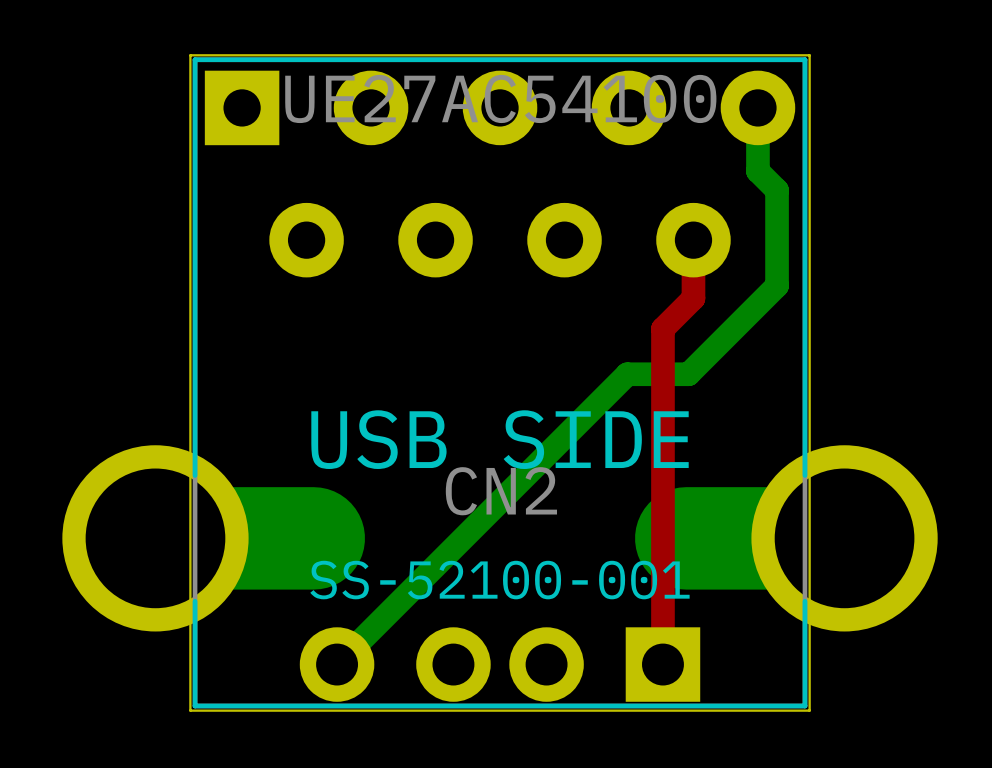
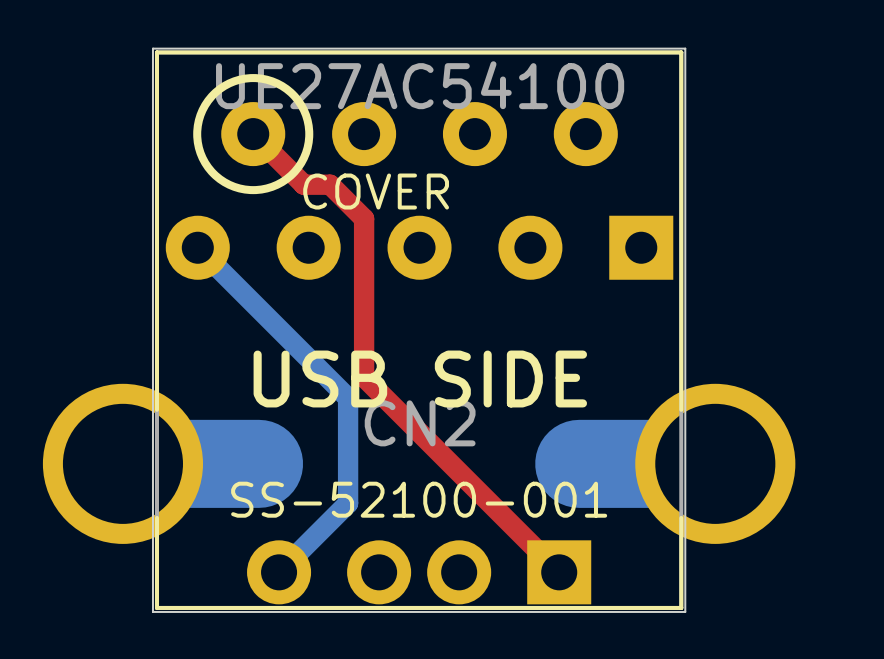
drawing: none -> [193, 74, 314, 195]
bottom track: (757, 107) (757, 171) (777, 190) (777, 285) (688, 374) (627, 374) (417, 584) -> (197, 247) (348, 398) (348, 503)
part rotation: 0° (500, 174) -> 180° (419, 190)
text: none -> COVER (376, 191)
top track: (693, 240) (693, 298) (662, 328) (662, 664) -> (253, 134) (303, 184) (330, 184) (364, 218) (364, 377) (559, 572)

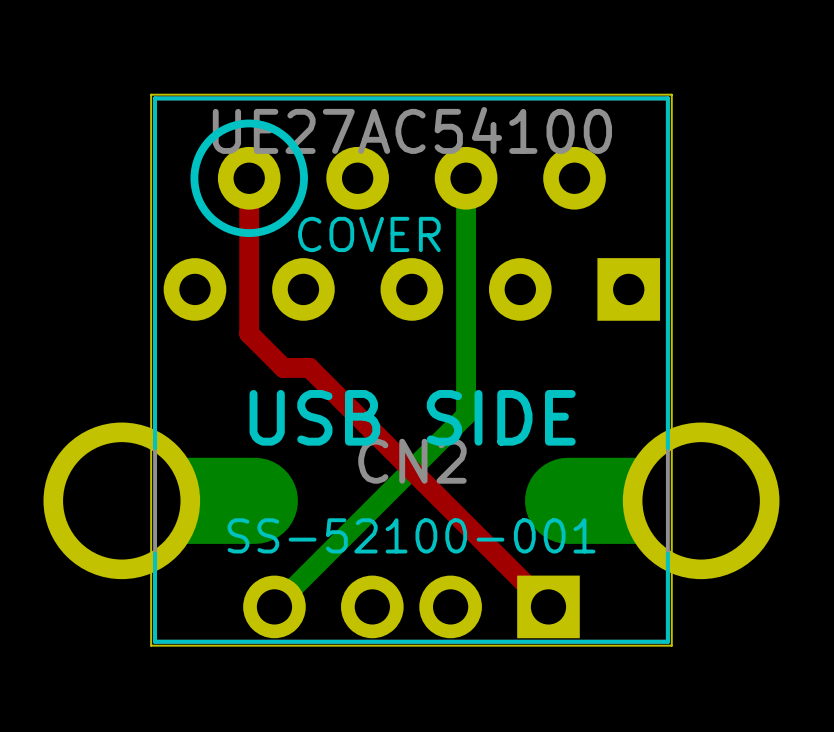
top track: (253, 134) (303, 184) (330, 184) (364, 218) (364, 377) -> (249, 178) (249, 333) (283, 367) (309, 367) (357, 416)
bottom track: (197, 247) (348, 398) (348, 503) -> (466, 178) (466, 415) (341, 539)

